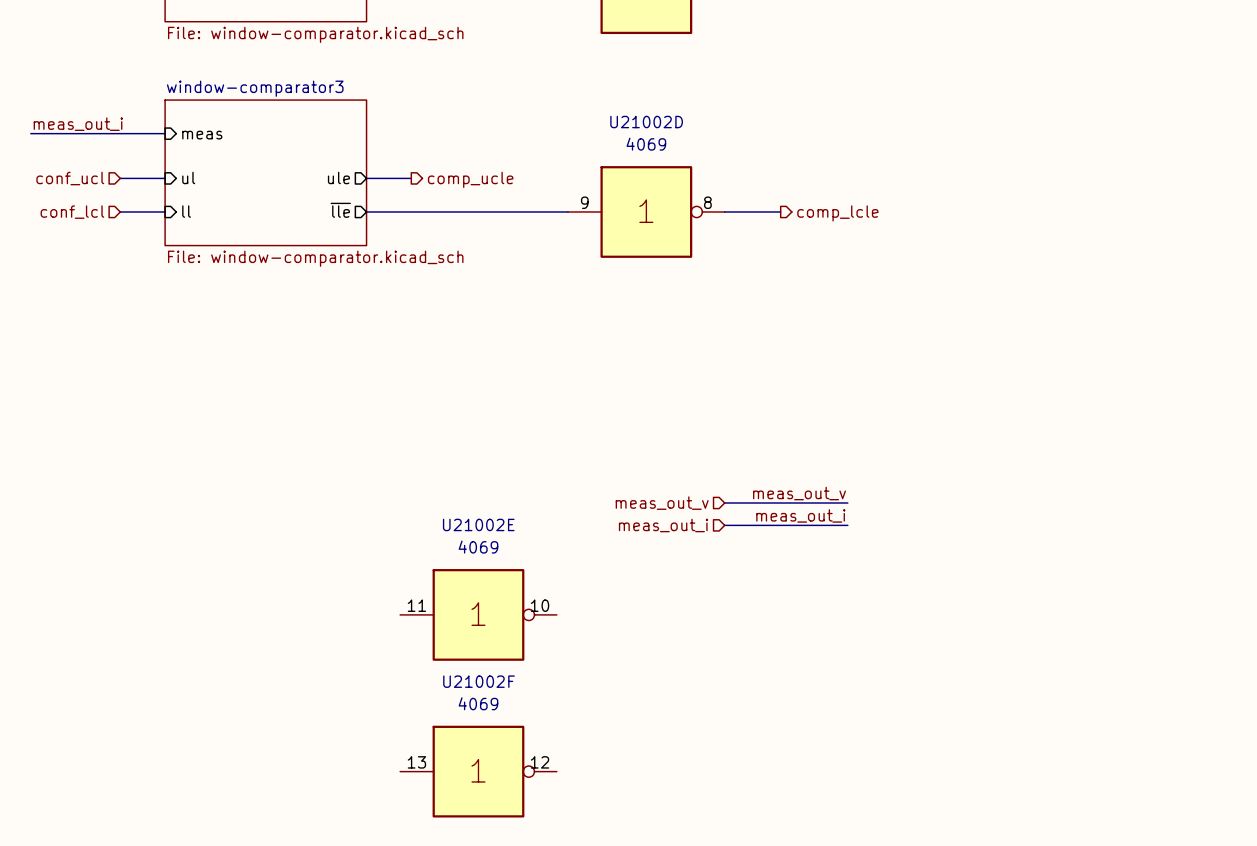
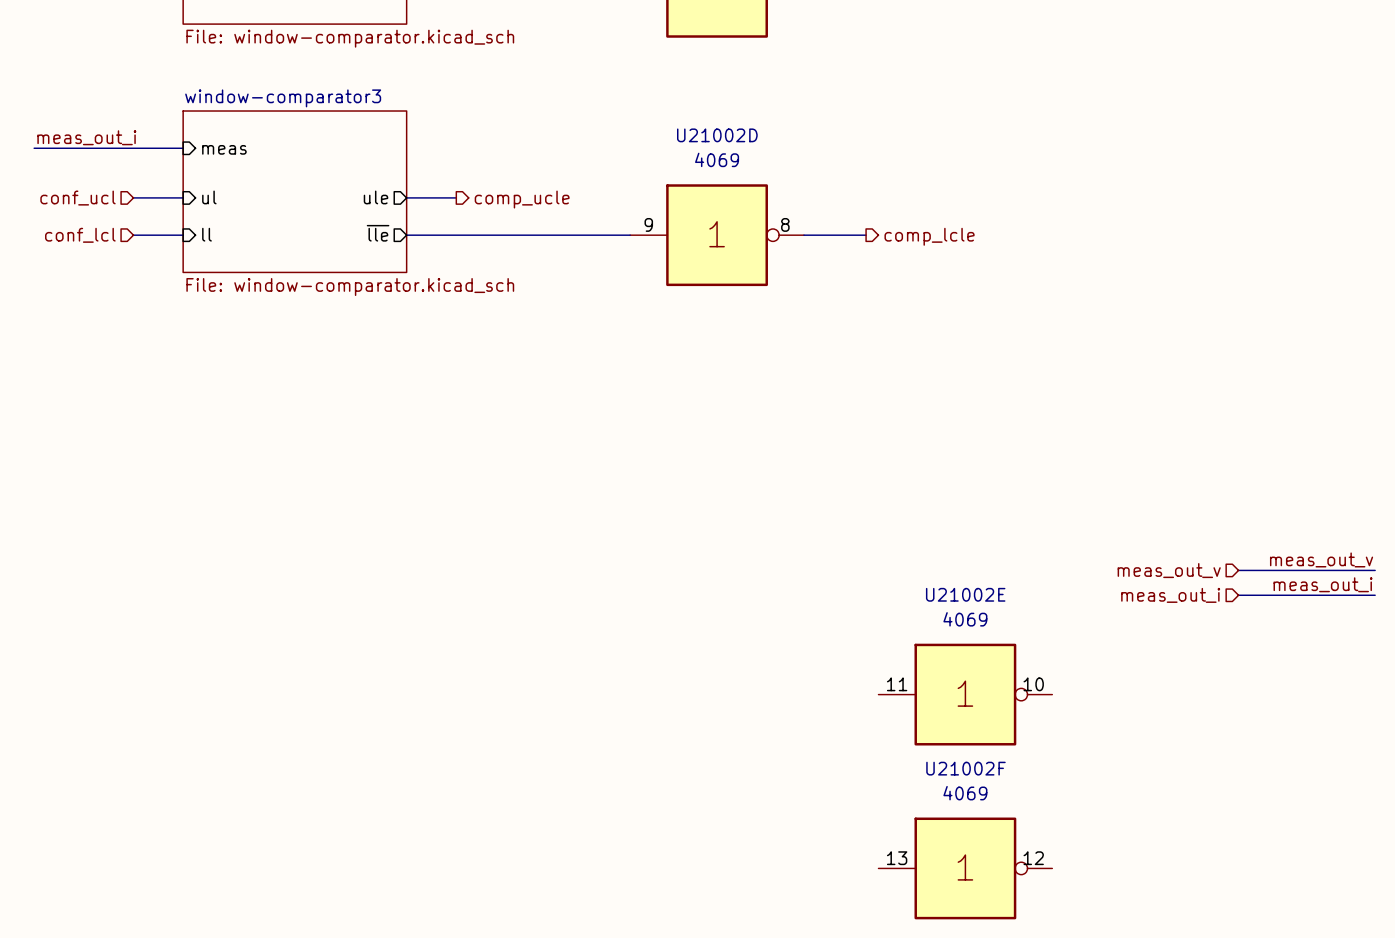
label: meas_out_v (799, 493) -> none
wire: (724, 502) (847, 502) -> none
hierarchical label: meas_out_v (662, 503) -> none
label: none -> meas_out_v (1321, 559)
hierarchical label: none -> meas_out_v (1169, 570)
wire: none -> (1238, 570) (1375, 570)
label: meas_out_i (800, 515) -> none
hierarchical label: meas_out_i (663, 525) -> none
wire: (724, 525) (847, 525) -> none
label: none -> meas_out_i (1323, 584)
hierarchical label: none -> meas_out_i (1170, 595)
wire: none -> (1238, 595) (1375, 595)
U21002E position: (478, 614) -> (965, 694)
U21002F position: (478, 771) -> (965, 868)

